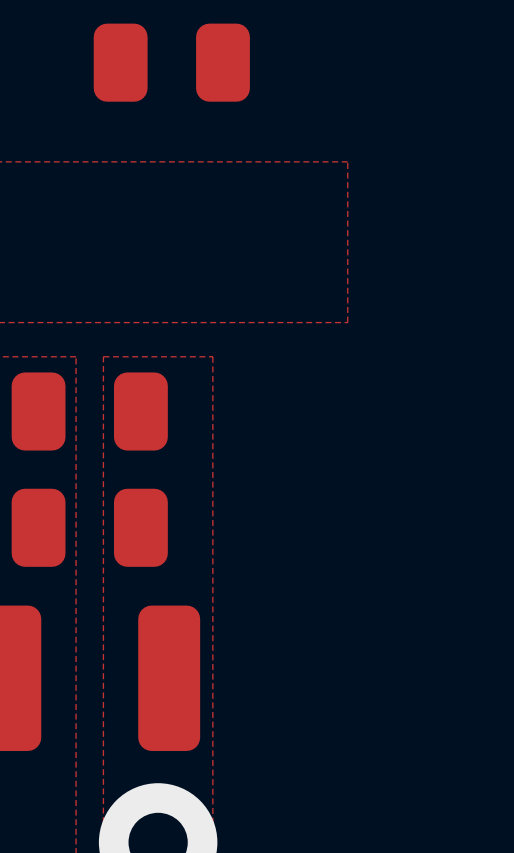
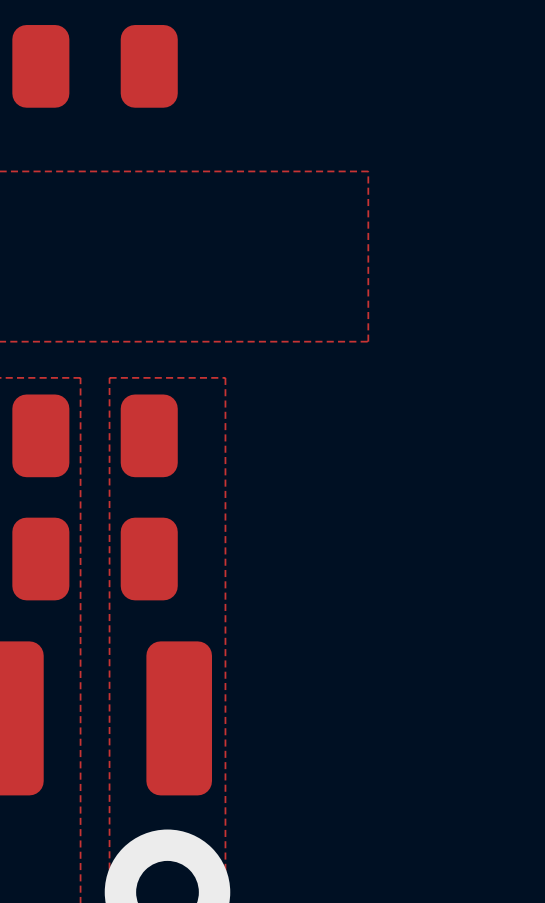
part position: (171, 62) -> (95, 66)

